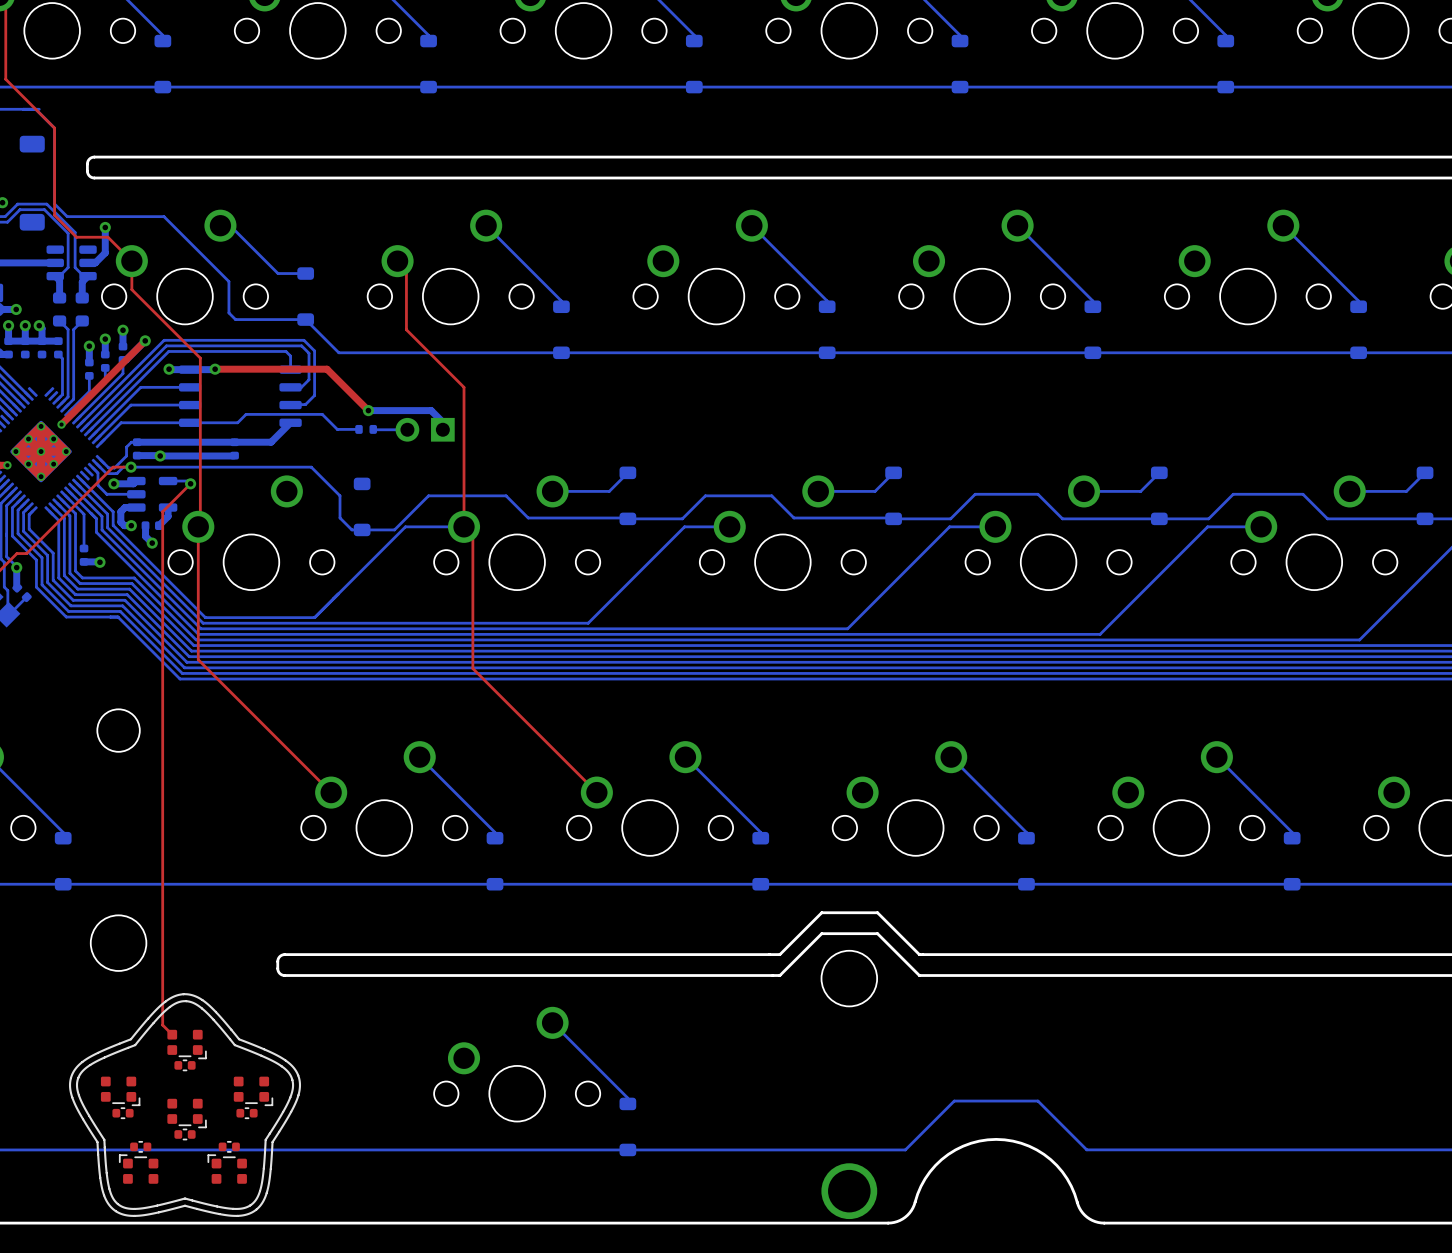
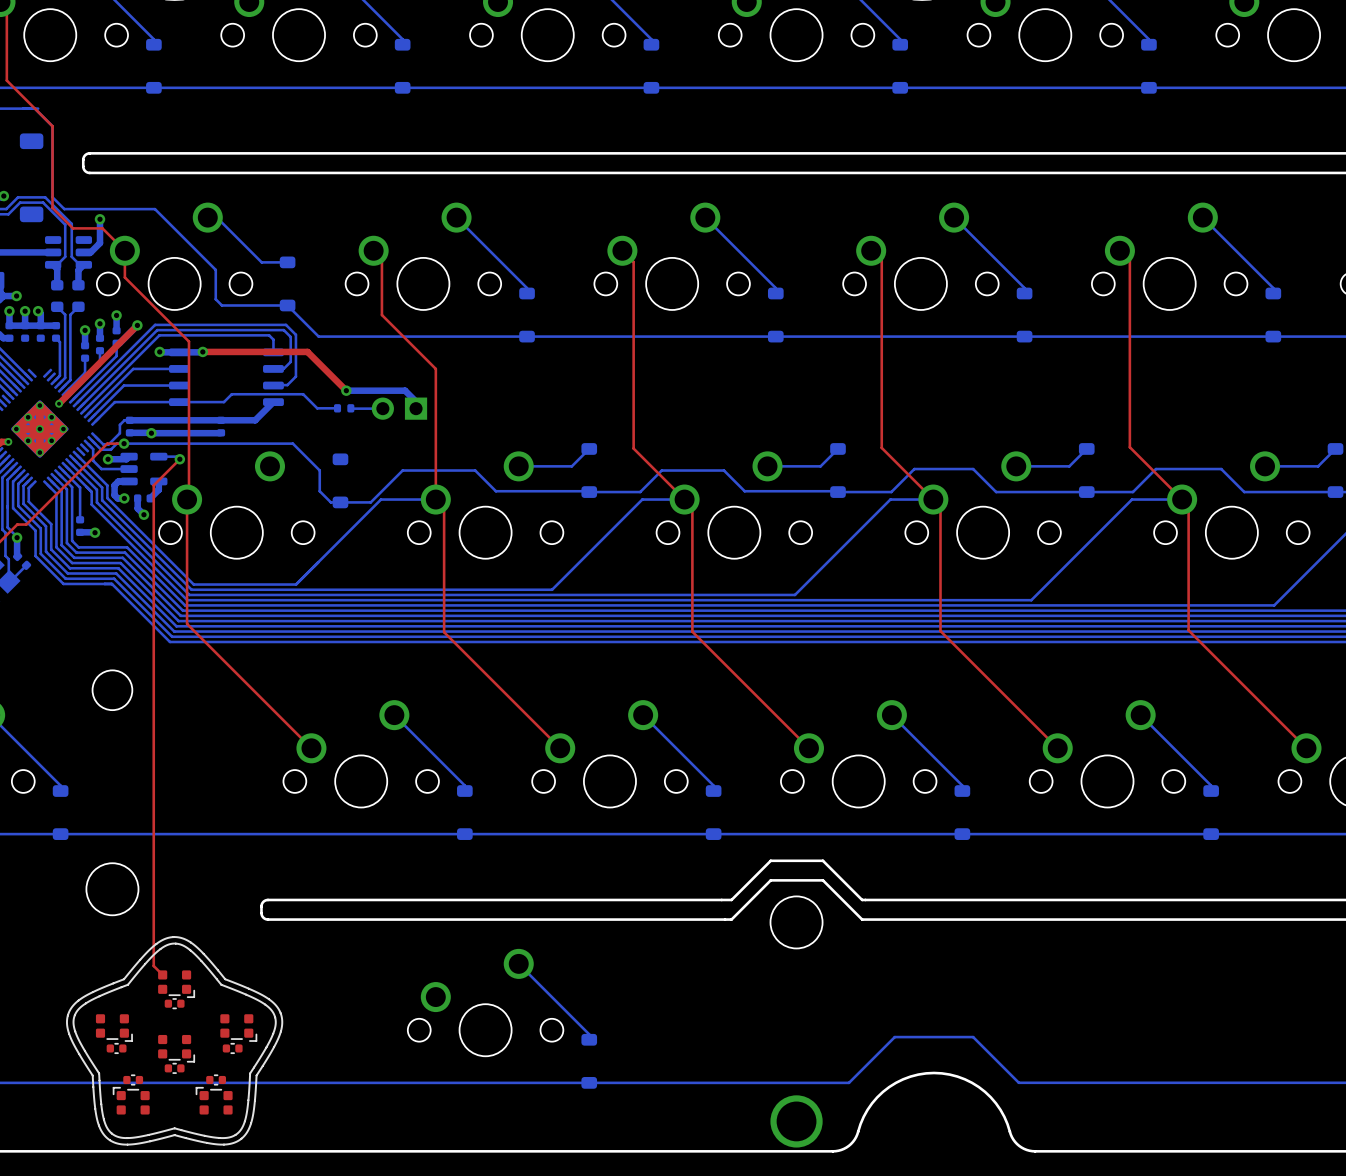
top track: none -> (622, 250) (633, 262) (633, 448) (692, 507) (692, 631) (808, 748)
top track: none -> (871, 250) (881, 261) (881, 447) (940, 506) (940, 631) (1057, 748)
top track: none -> (1119, 250) (1129, 260) (1129, 447) (1188, 506) (1188, 630) (1306, 748)

